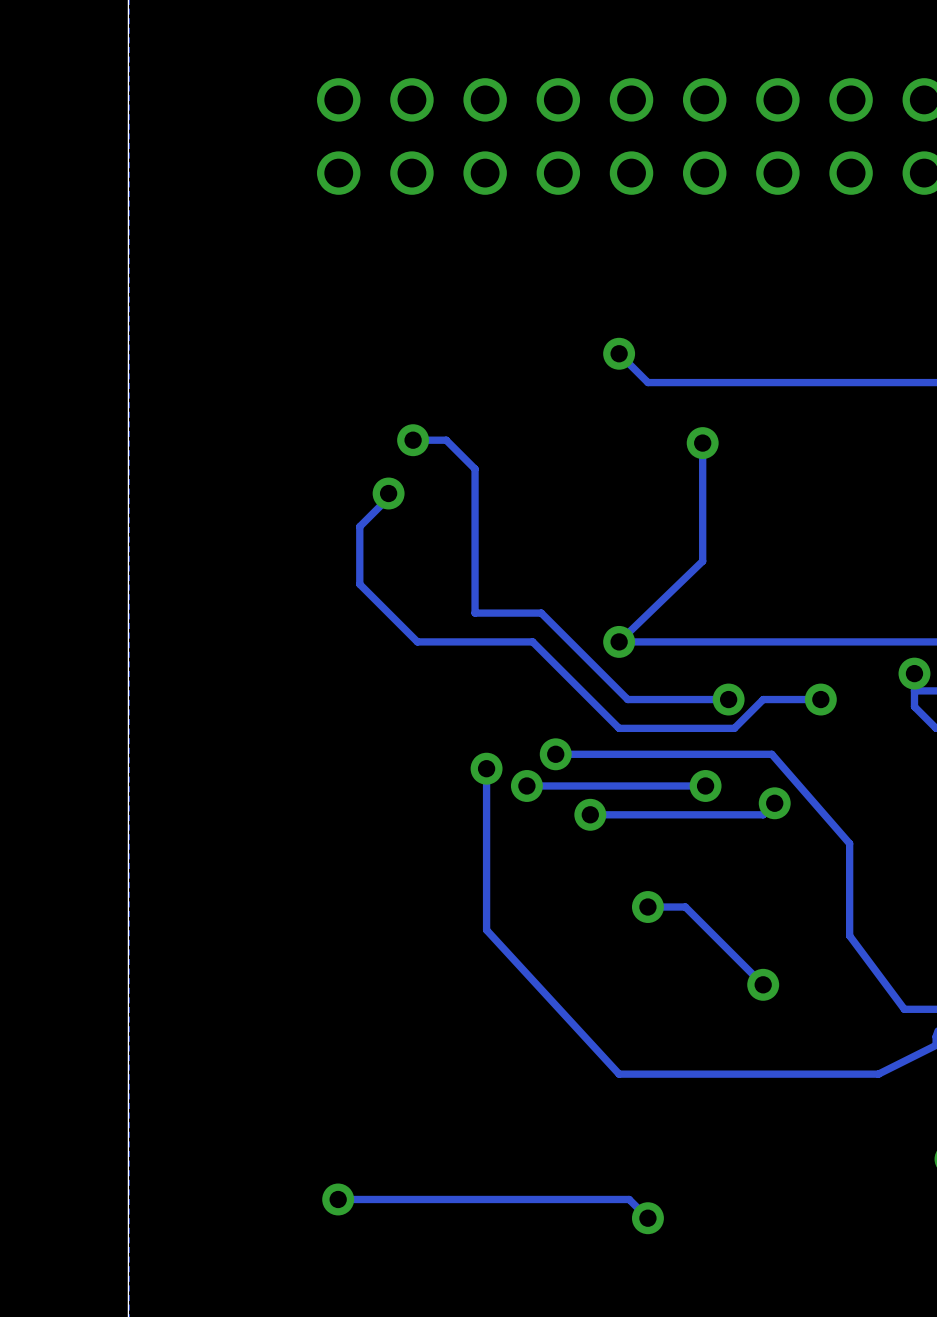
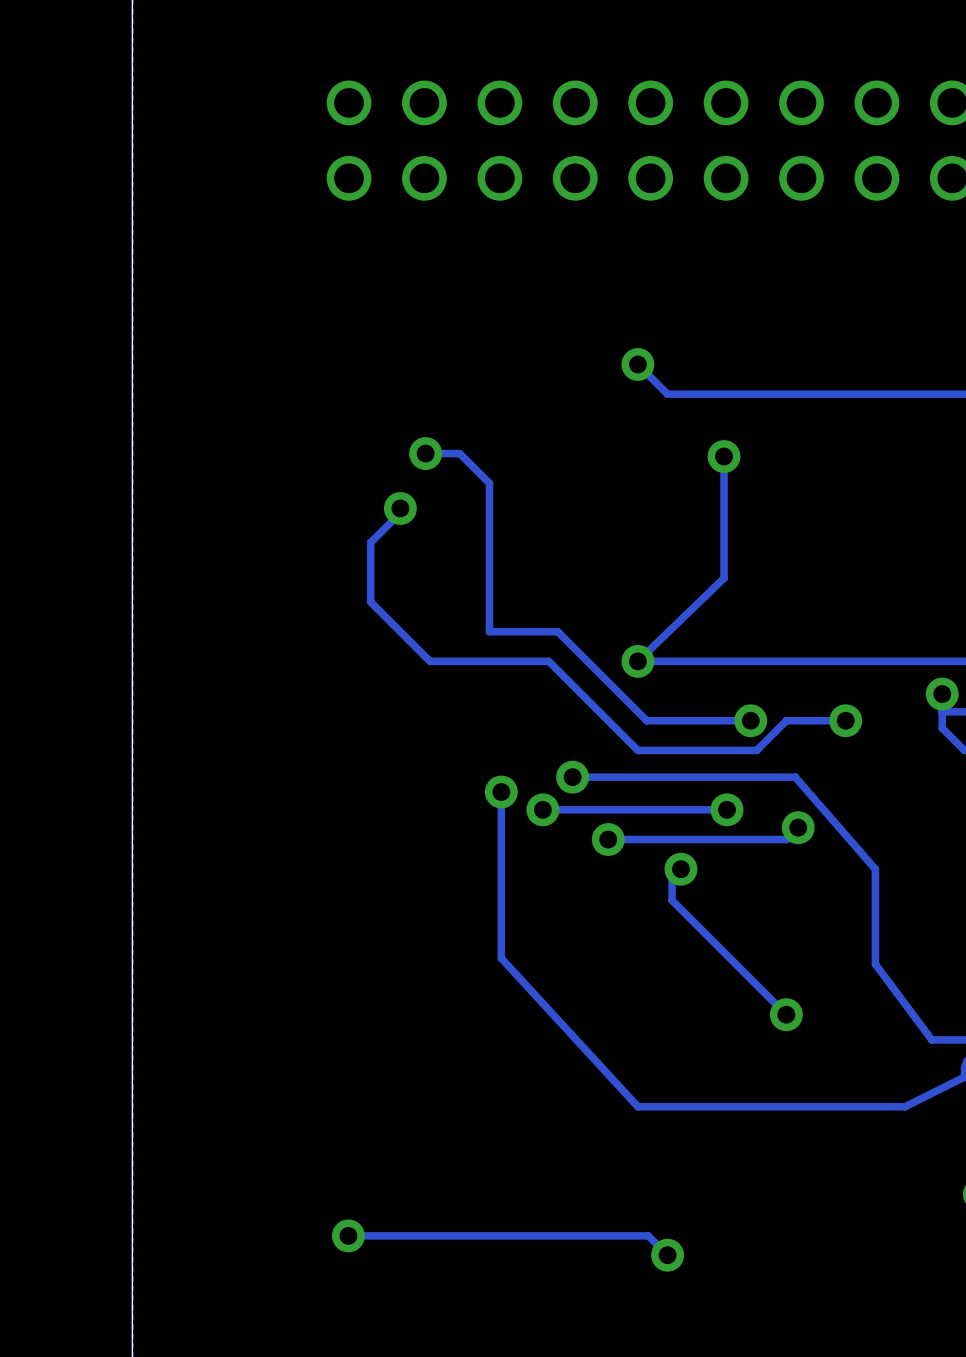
via position: (647, 907) -> (680, 869)
track: (685, 907) (647, 907) -> (706, 934) (672, 900) (672, 869) (680, 869)

